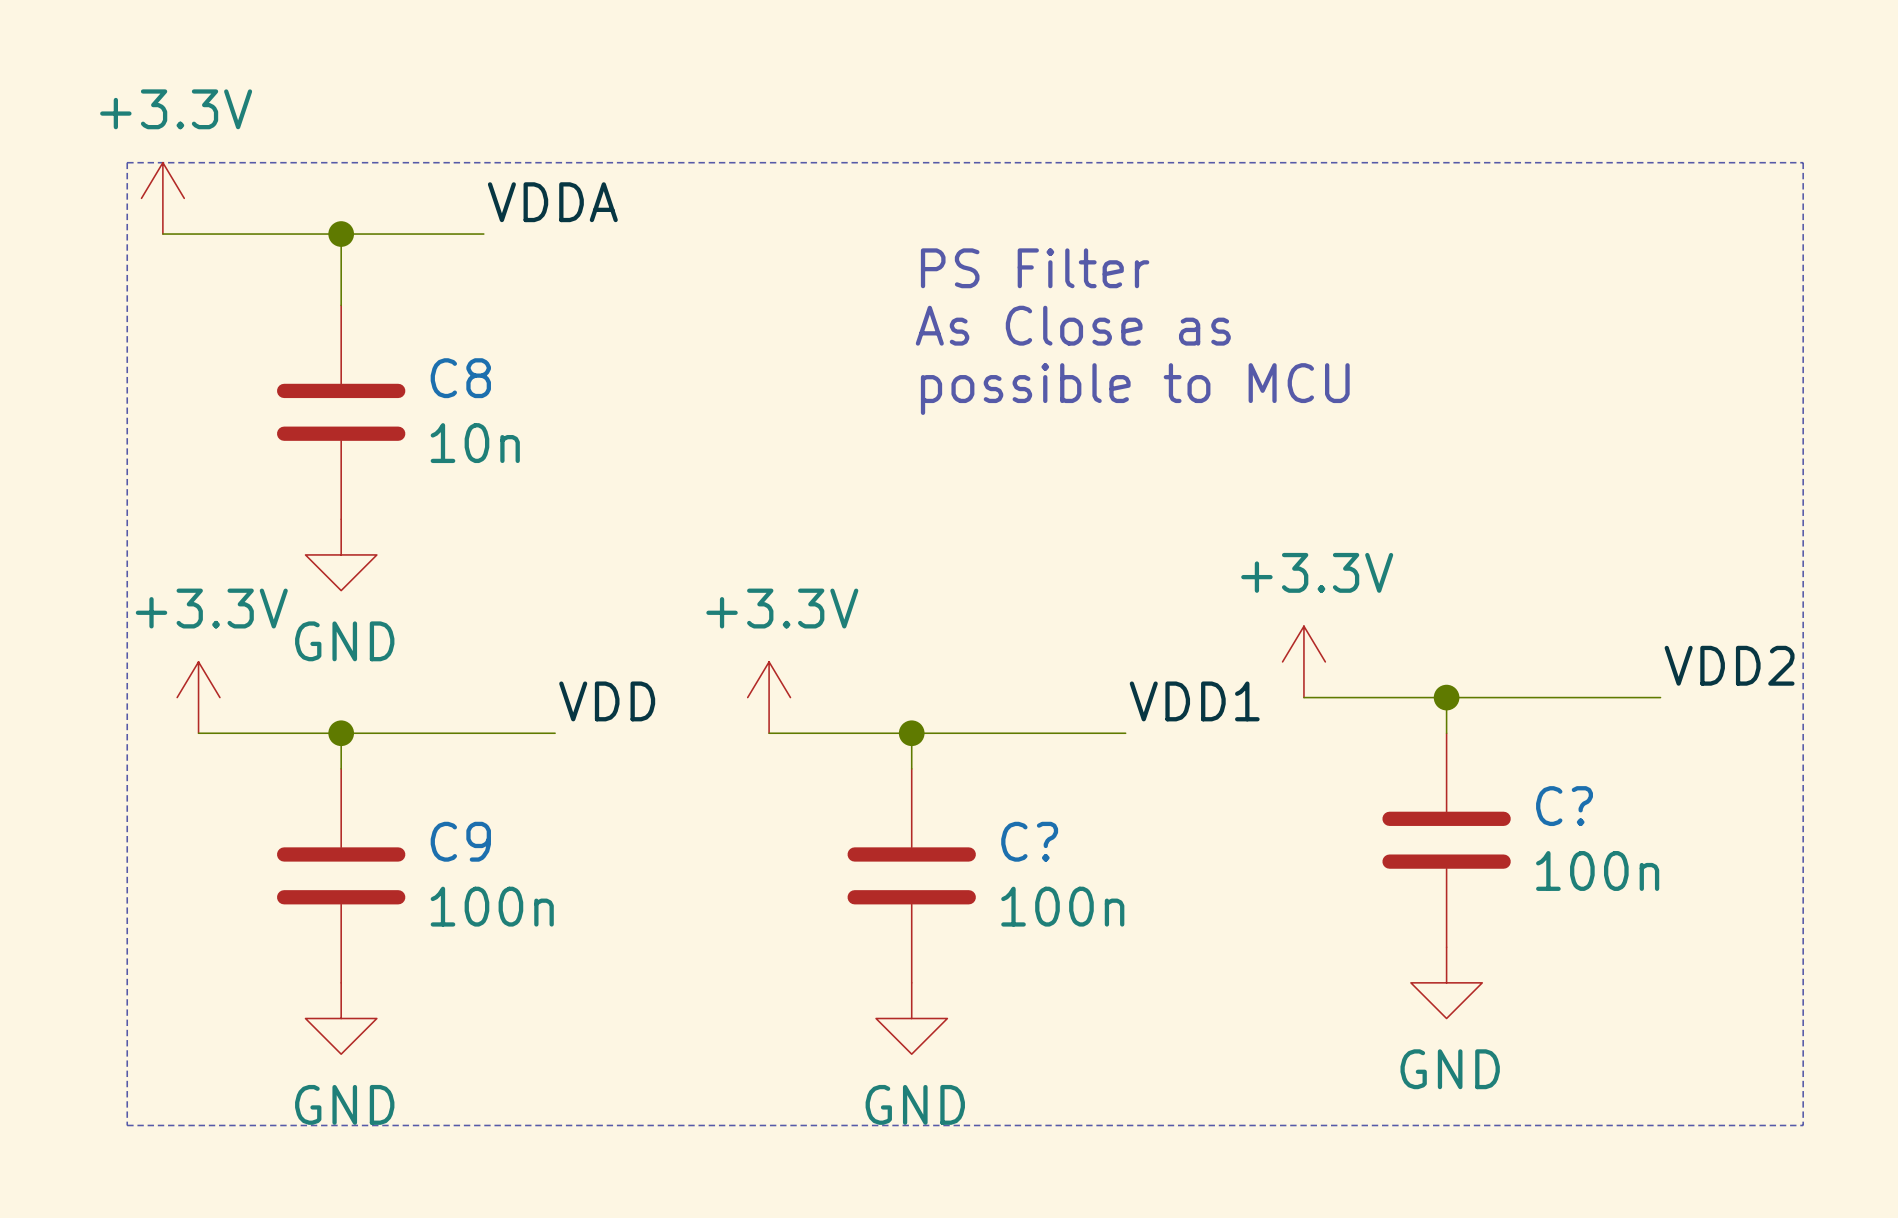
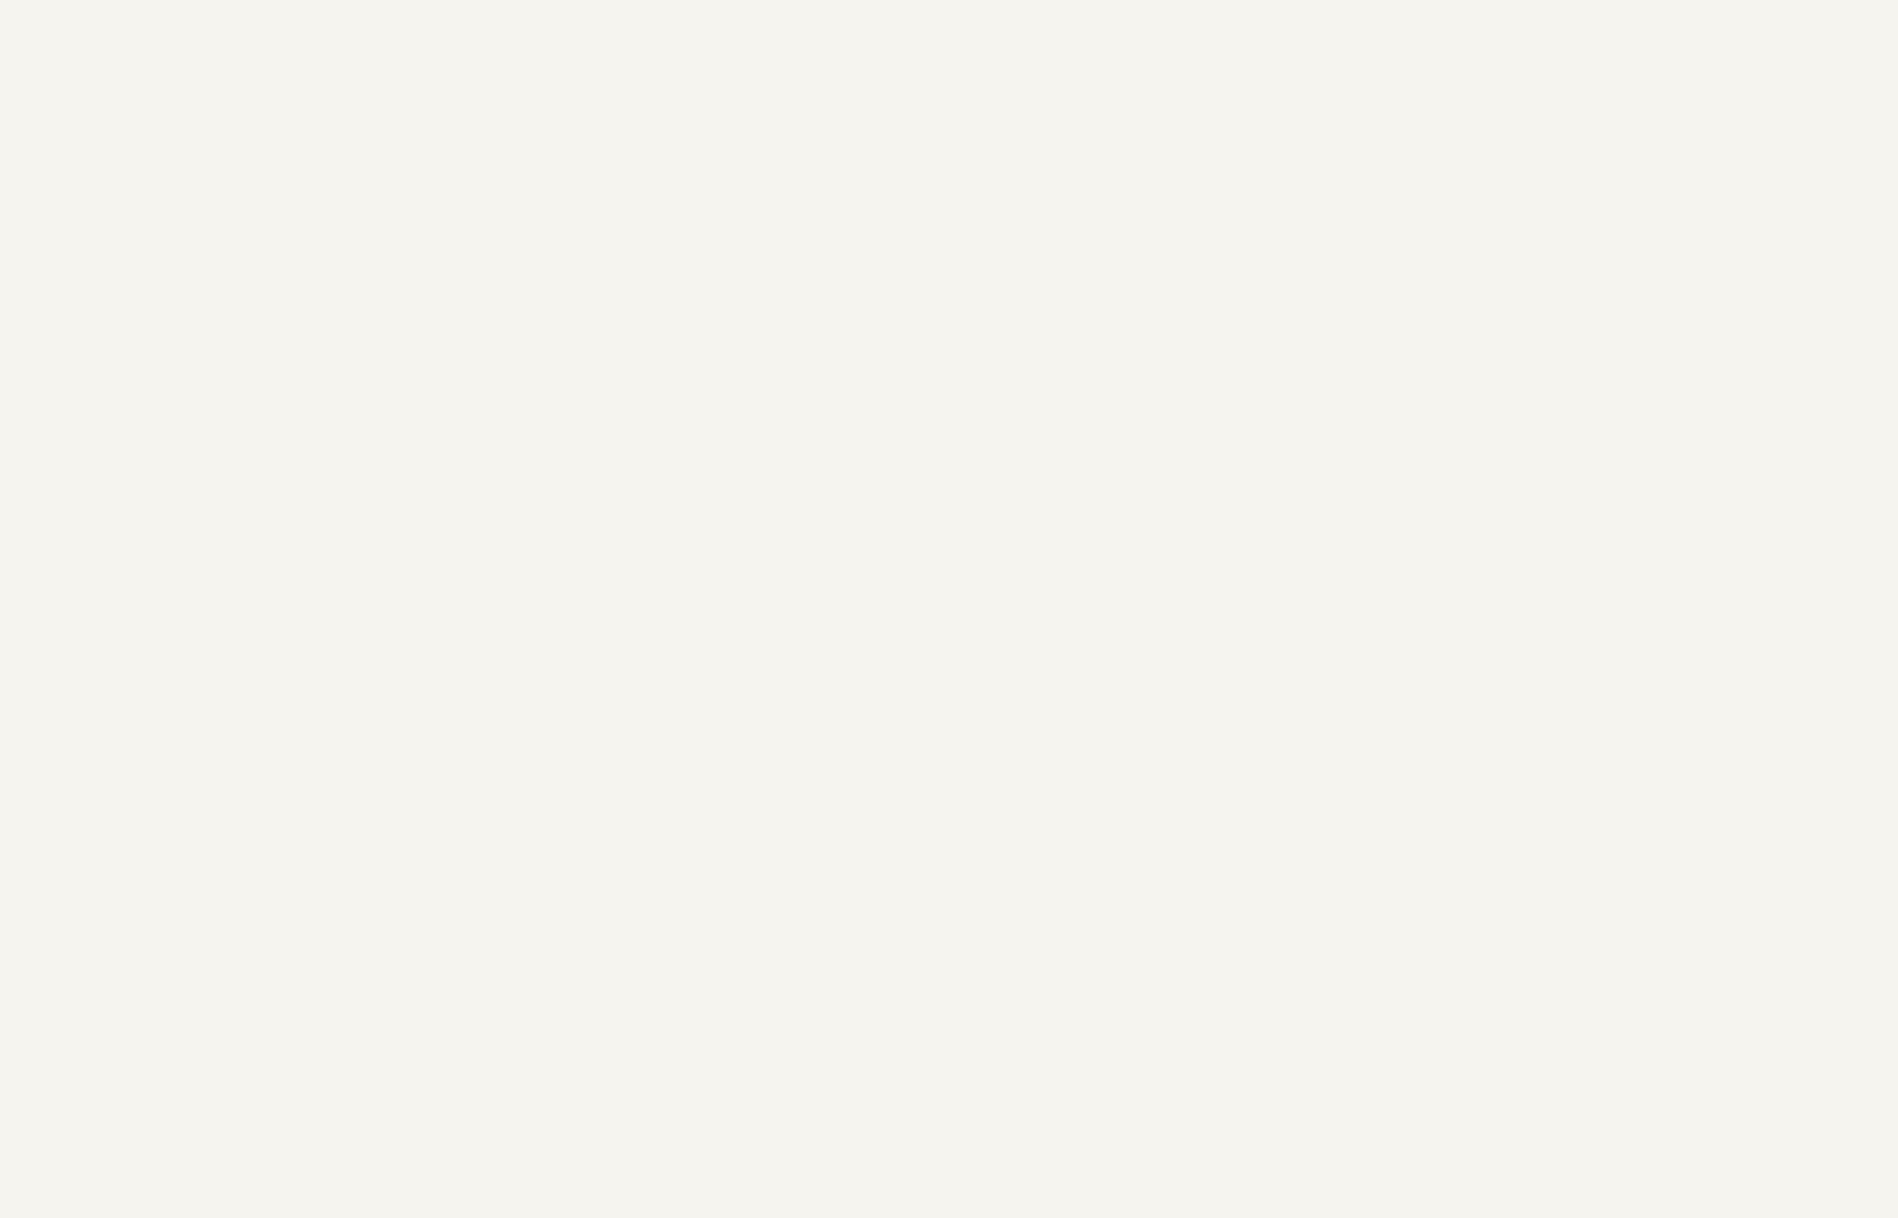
line: (127, 162) (127, 1125) (1803, 1125) (1803, 162) (127, 162) -> none
power symbol: +3.3V (162, 198) -> none
label: VDDA (552, 202) -> none
wire: (162, 234) (483, 234) -> none
wire: (341, 234) (341, 305) -> none
junction: (341, 234) -> none
text: PS Filter (1035, 268) -> none
text: As Close as (1073, 325) -> none
text: possible to MCU (1135, 389) -> none
C8: 10n (341, 412) -> none
power symbol: GND (341, 554) -> none
power symbol: +3.3V (1303, 661) -> none
label: VDD2 (1729, 665) -> none
power symbol: +3.3V (198, 697) -> none
power symbol: +3.3V (769, 697) -> none
wire: (1303, 697) (1660, 697) -> none
wire: (1446, 697) (1446, 733) -> none
junction: (1446, 697) -> none
label: VDD (607, 701) -> none
label: VDD1 (1194, 701) -> none
wire: (198, 733) (555, 733) -> none
wire: (341, 733) (341, 768) -> none
junction: (341, 733) -> none
wire: (769, 733) (1125, 733) -> none
wire: (911, 733) (911, 768) -> none
junction: (911, 733) -> none
C?: 100n (1446, 840) -> none
C9: 100n (341, 875) -> none
C?: 100n (911, 875) -> none
power symbol: GND (1446, 982) -> none
power symbol: GND (341, 1018) -> none
power symbol: GND (911, 1018) -> none

